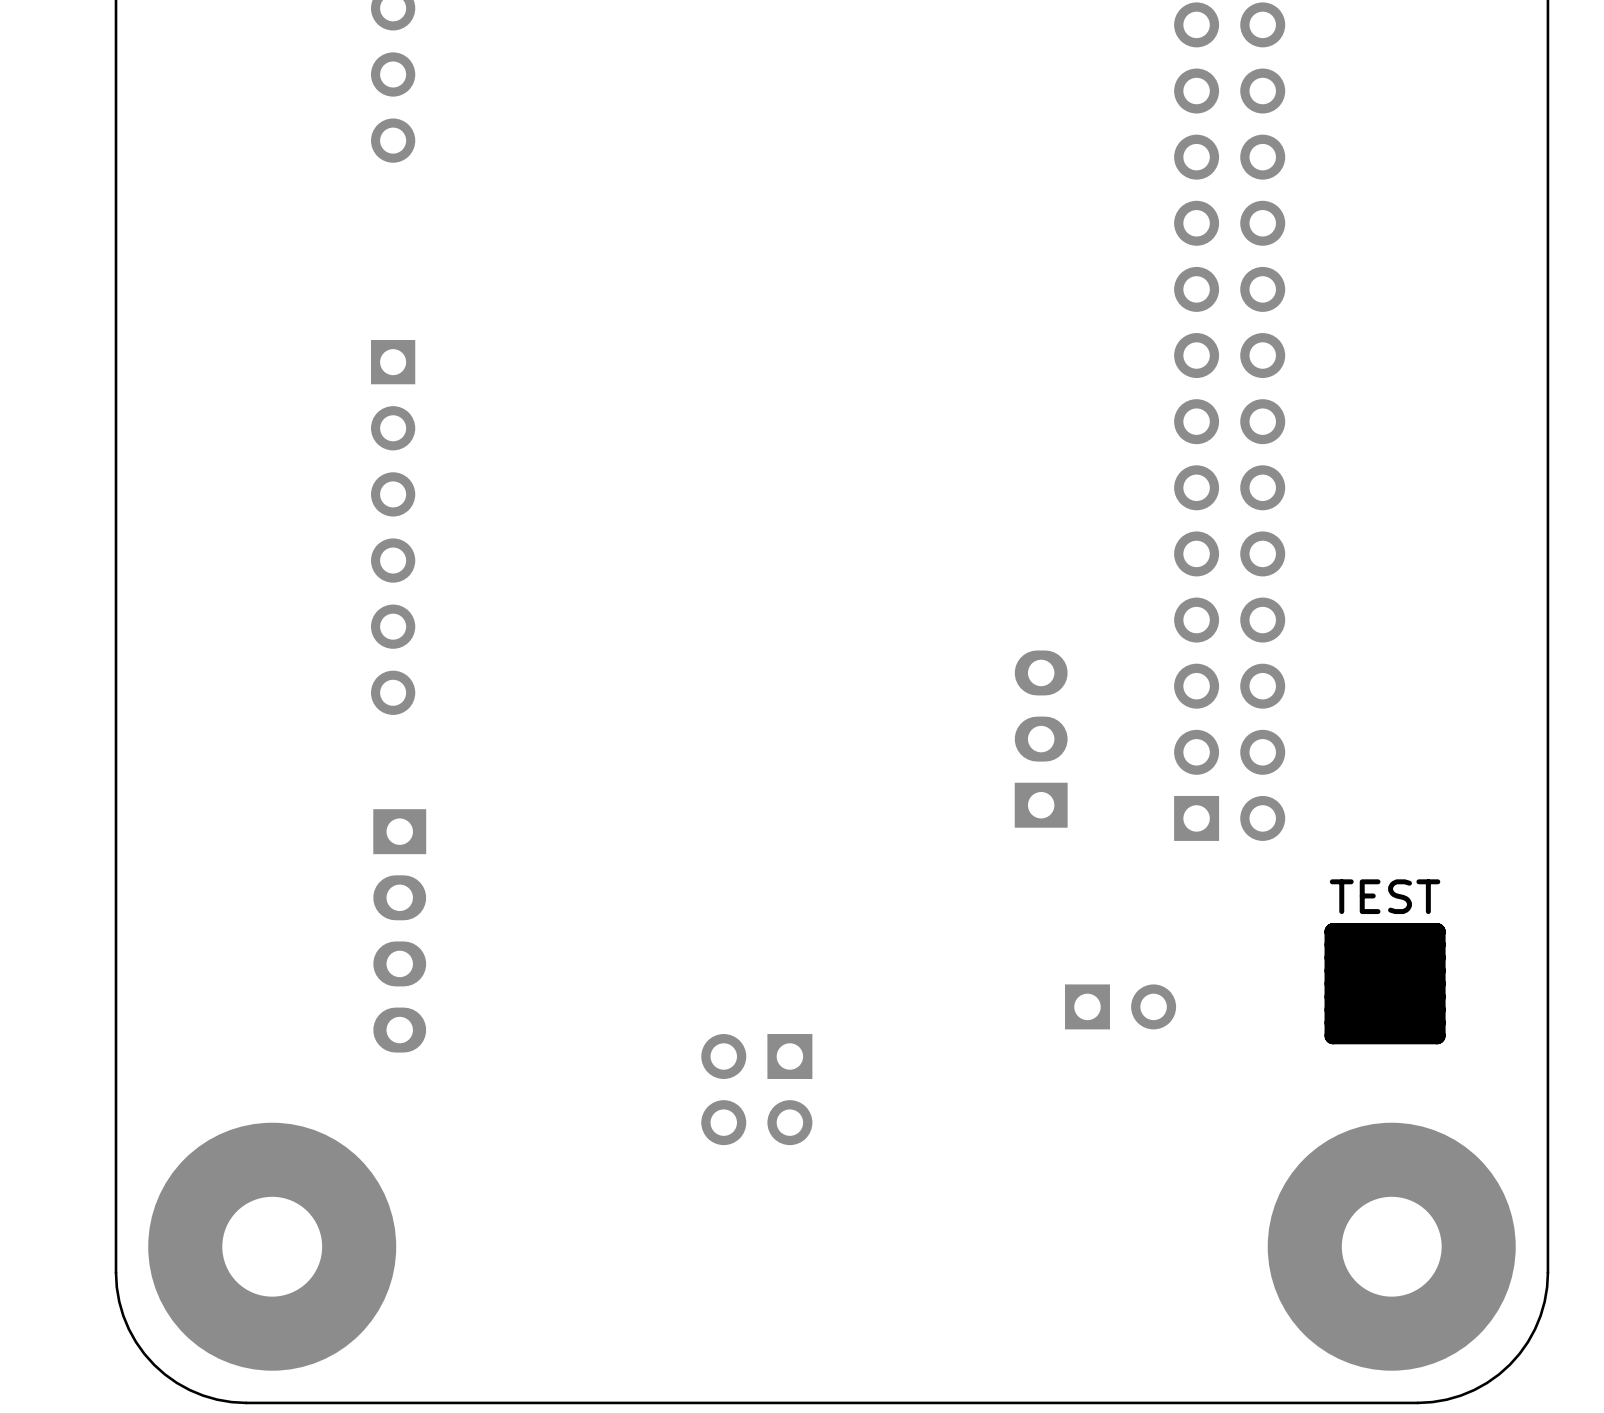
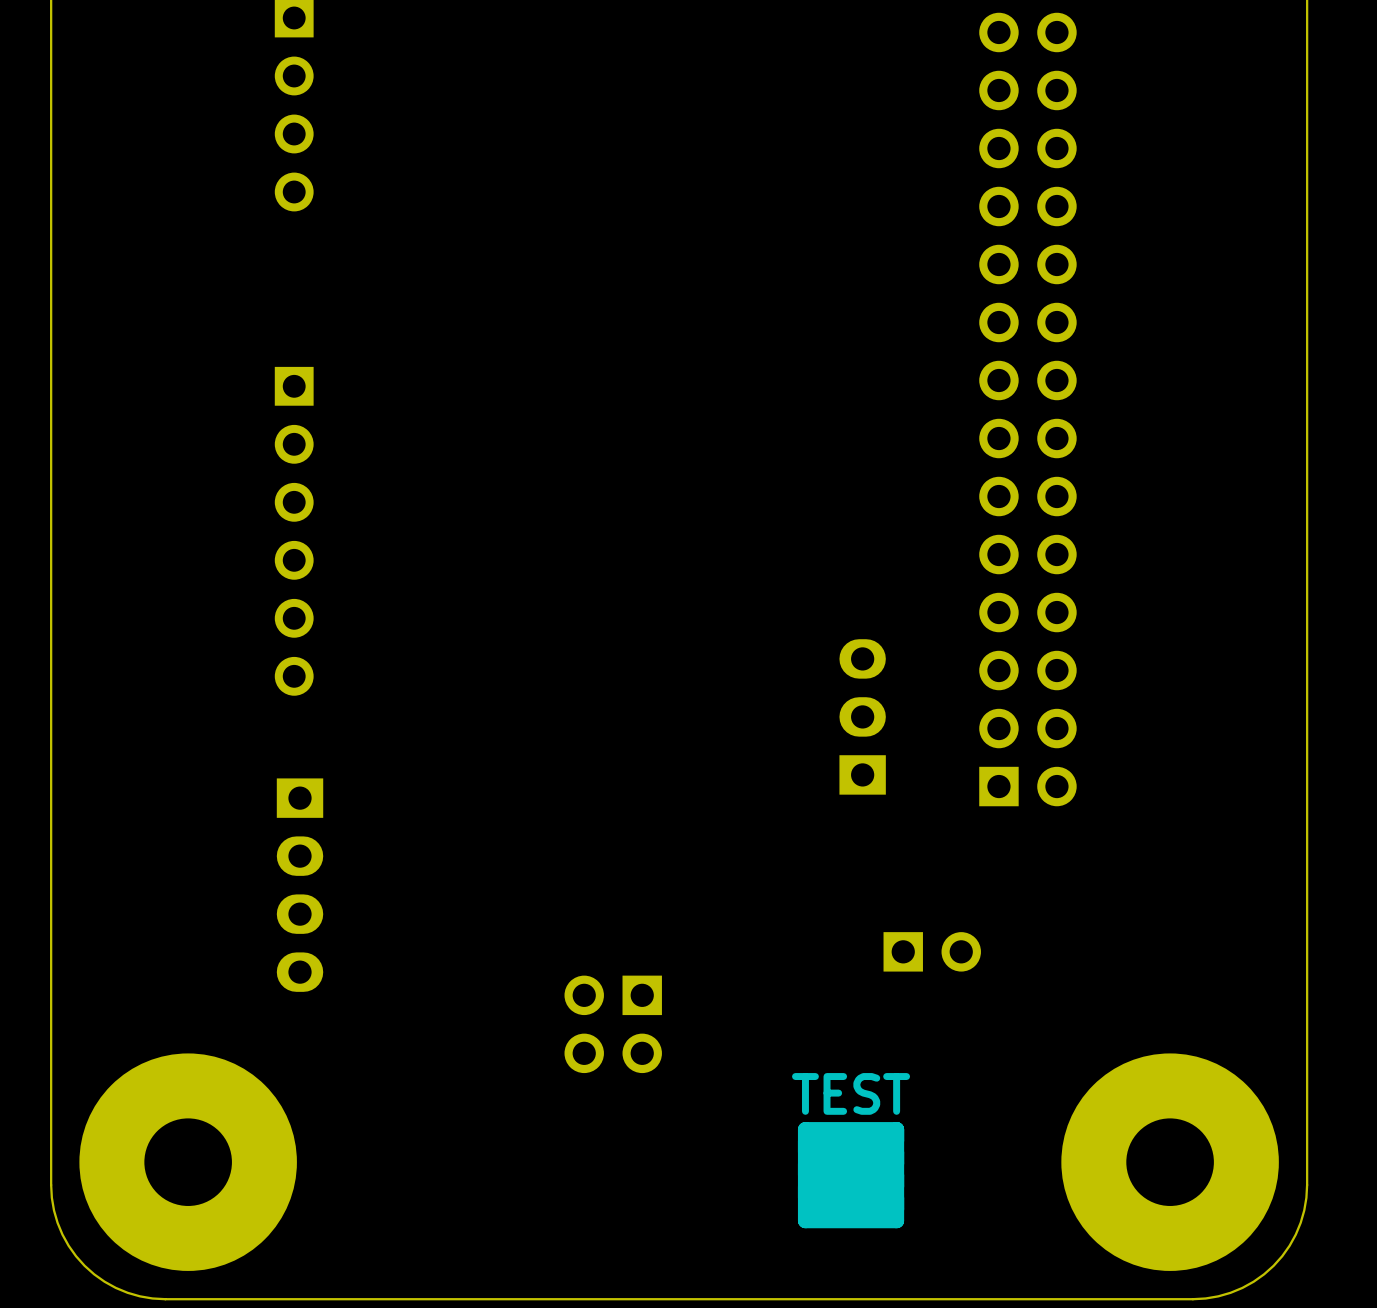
TEST: (1385, 983) -> none
TEST: none -> (851, 1175)

